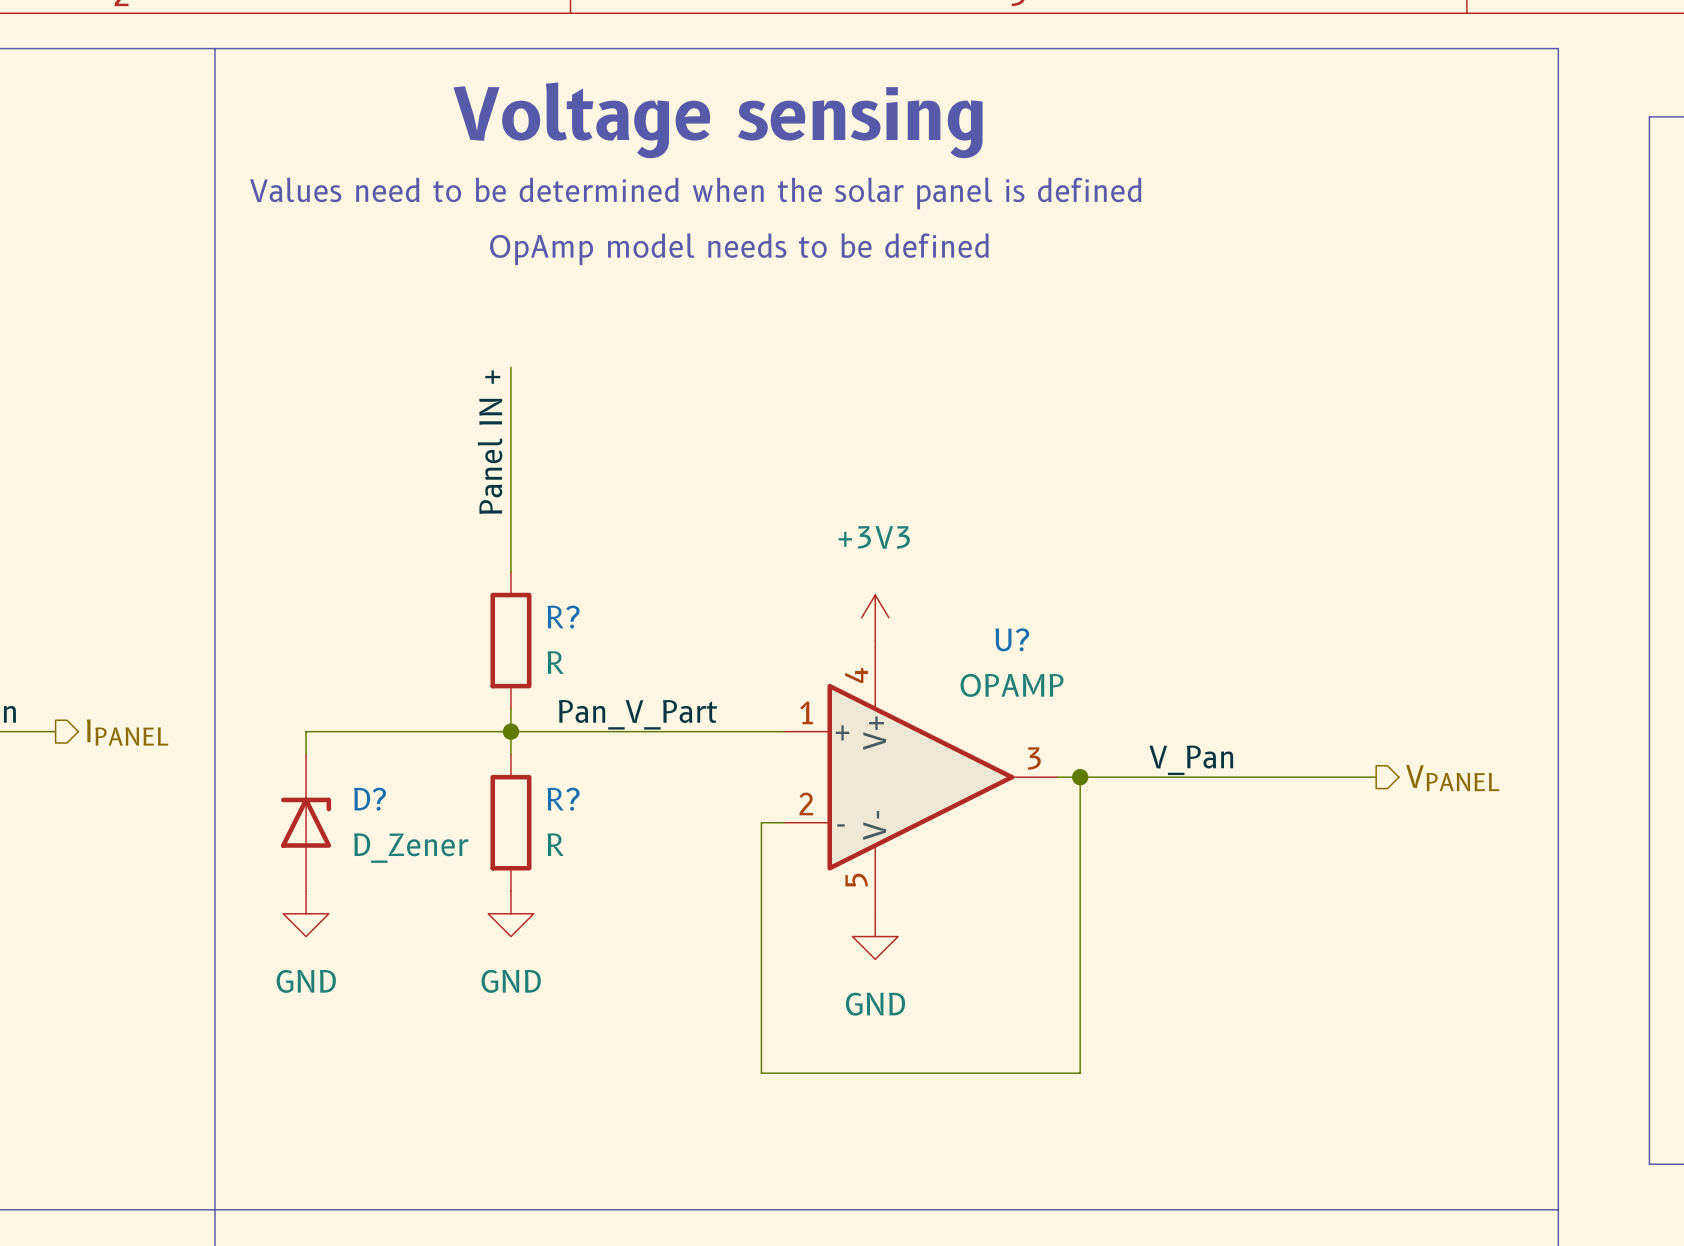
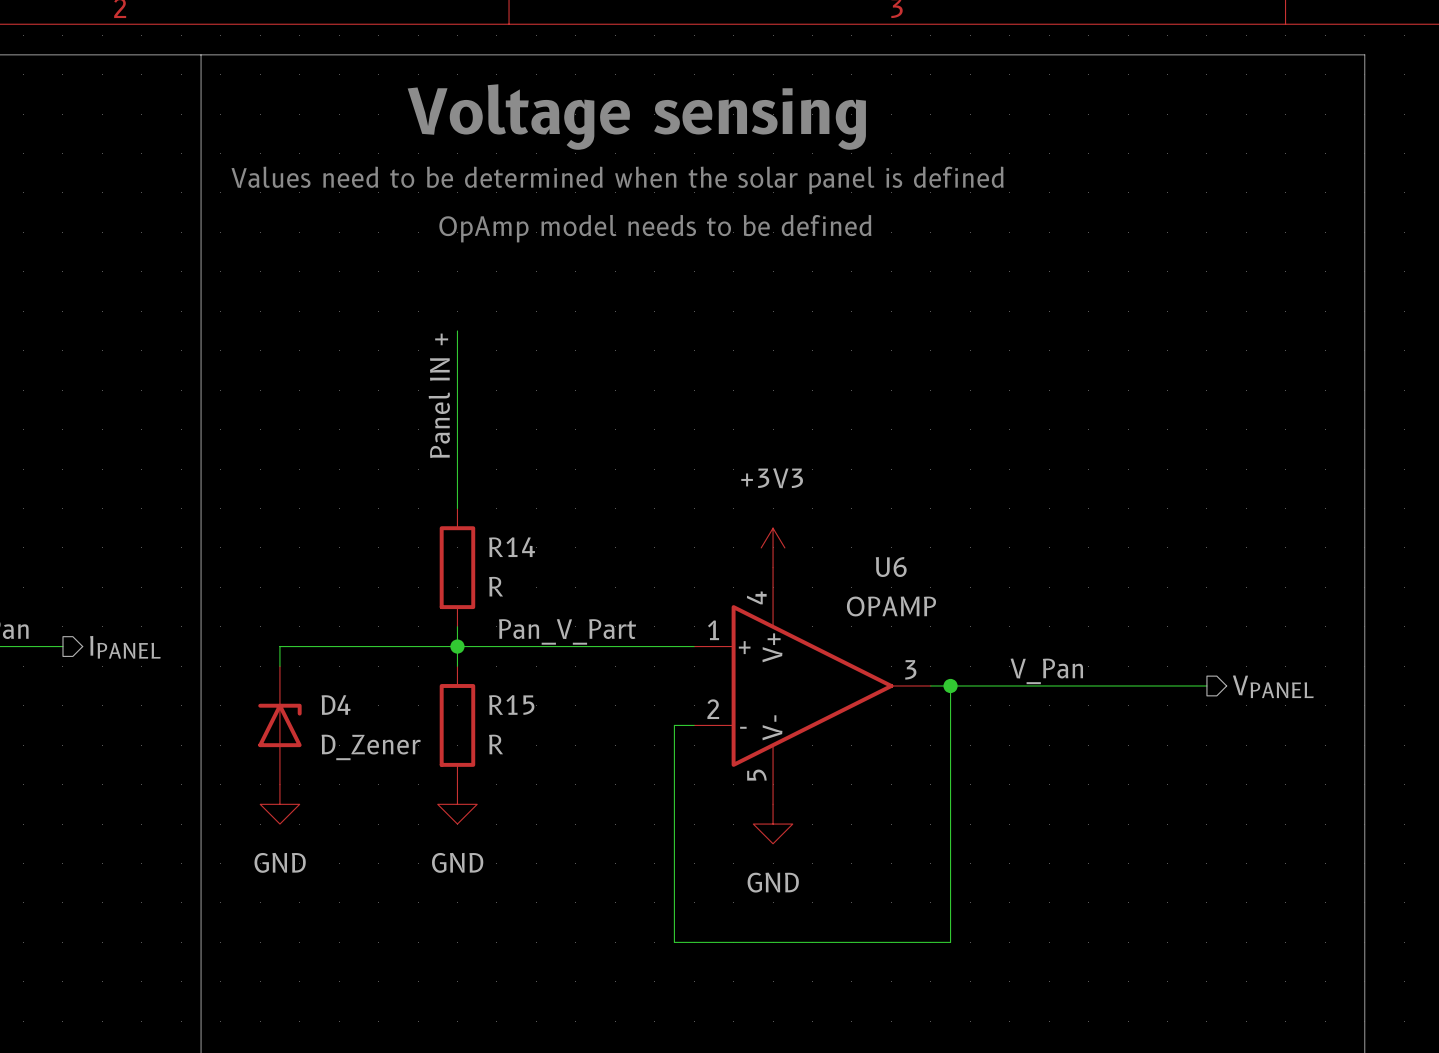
R? name: R? (563, 617) -> R14 (512, 547)
U? name: U? (1012, 639) -> U6 (891, 567)
D? name: D? (370, 799) -> D4 (336, 704)
R? name: R? (563, 799) -> R15 (511, 704)

